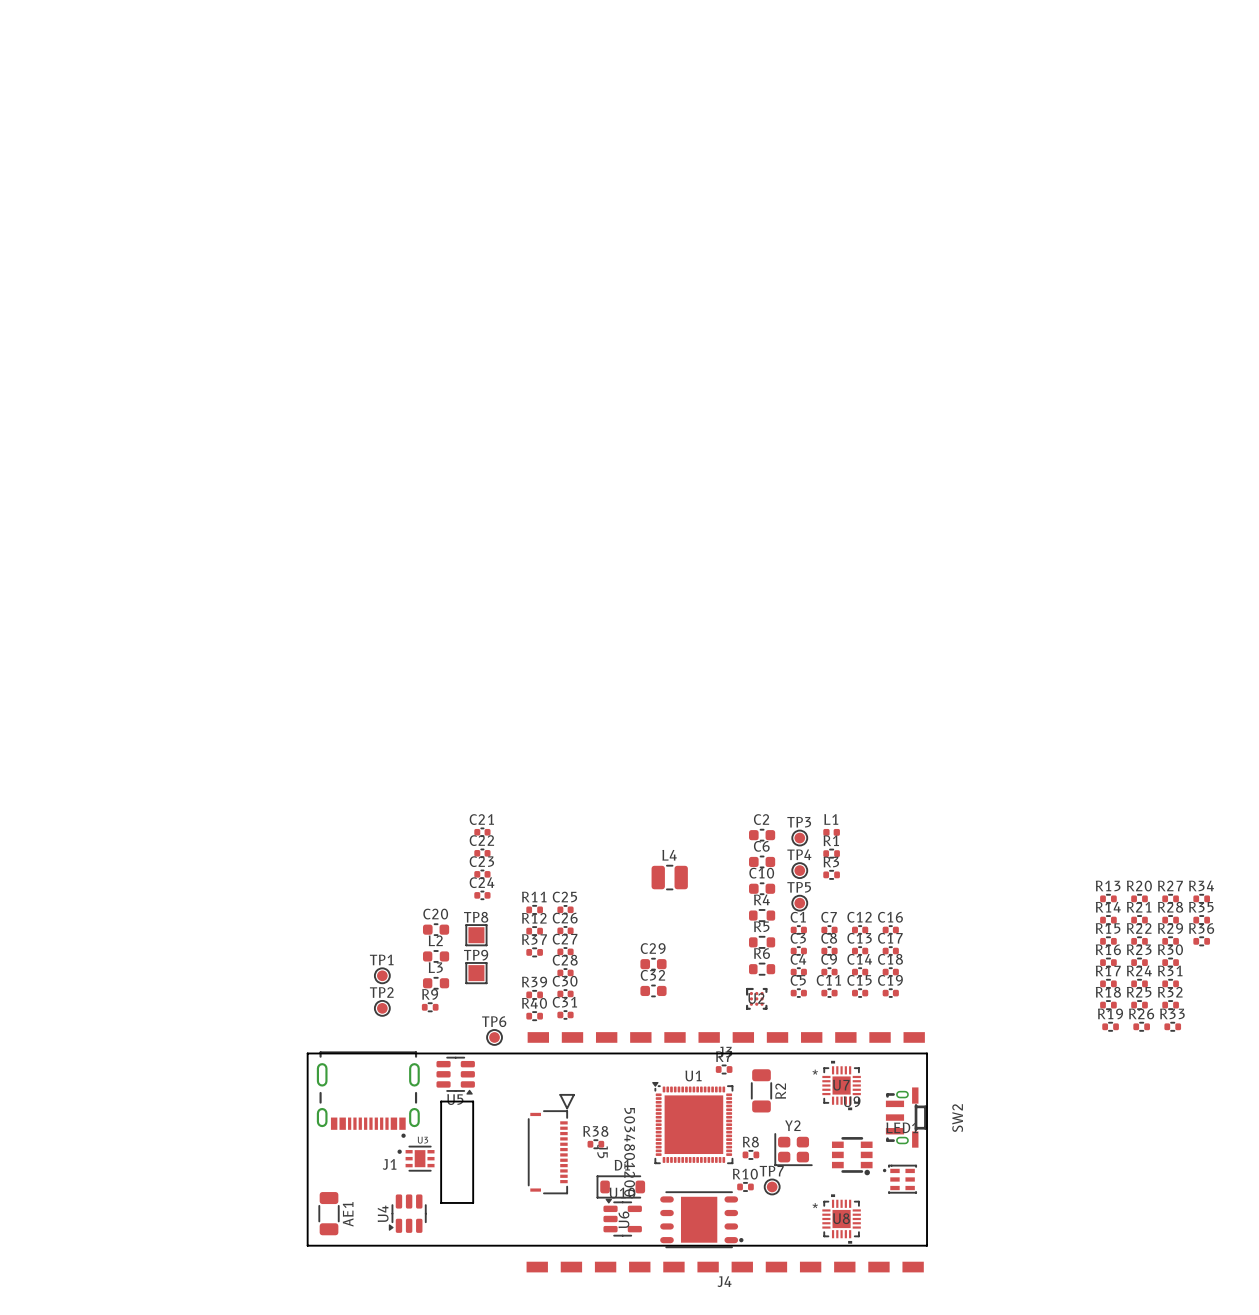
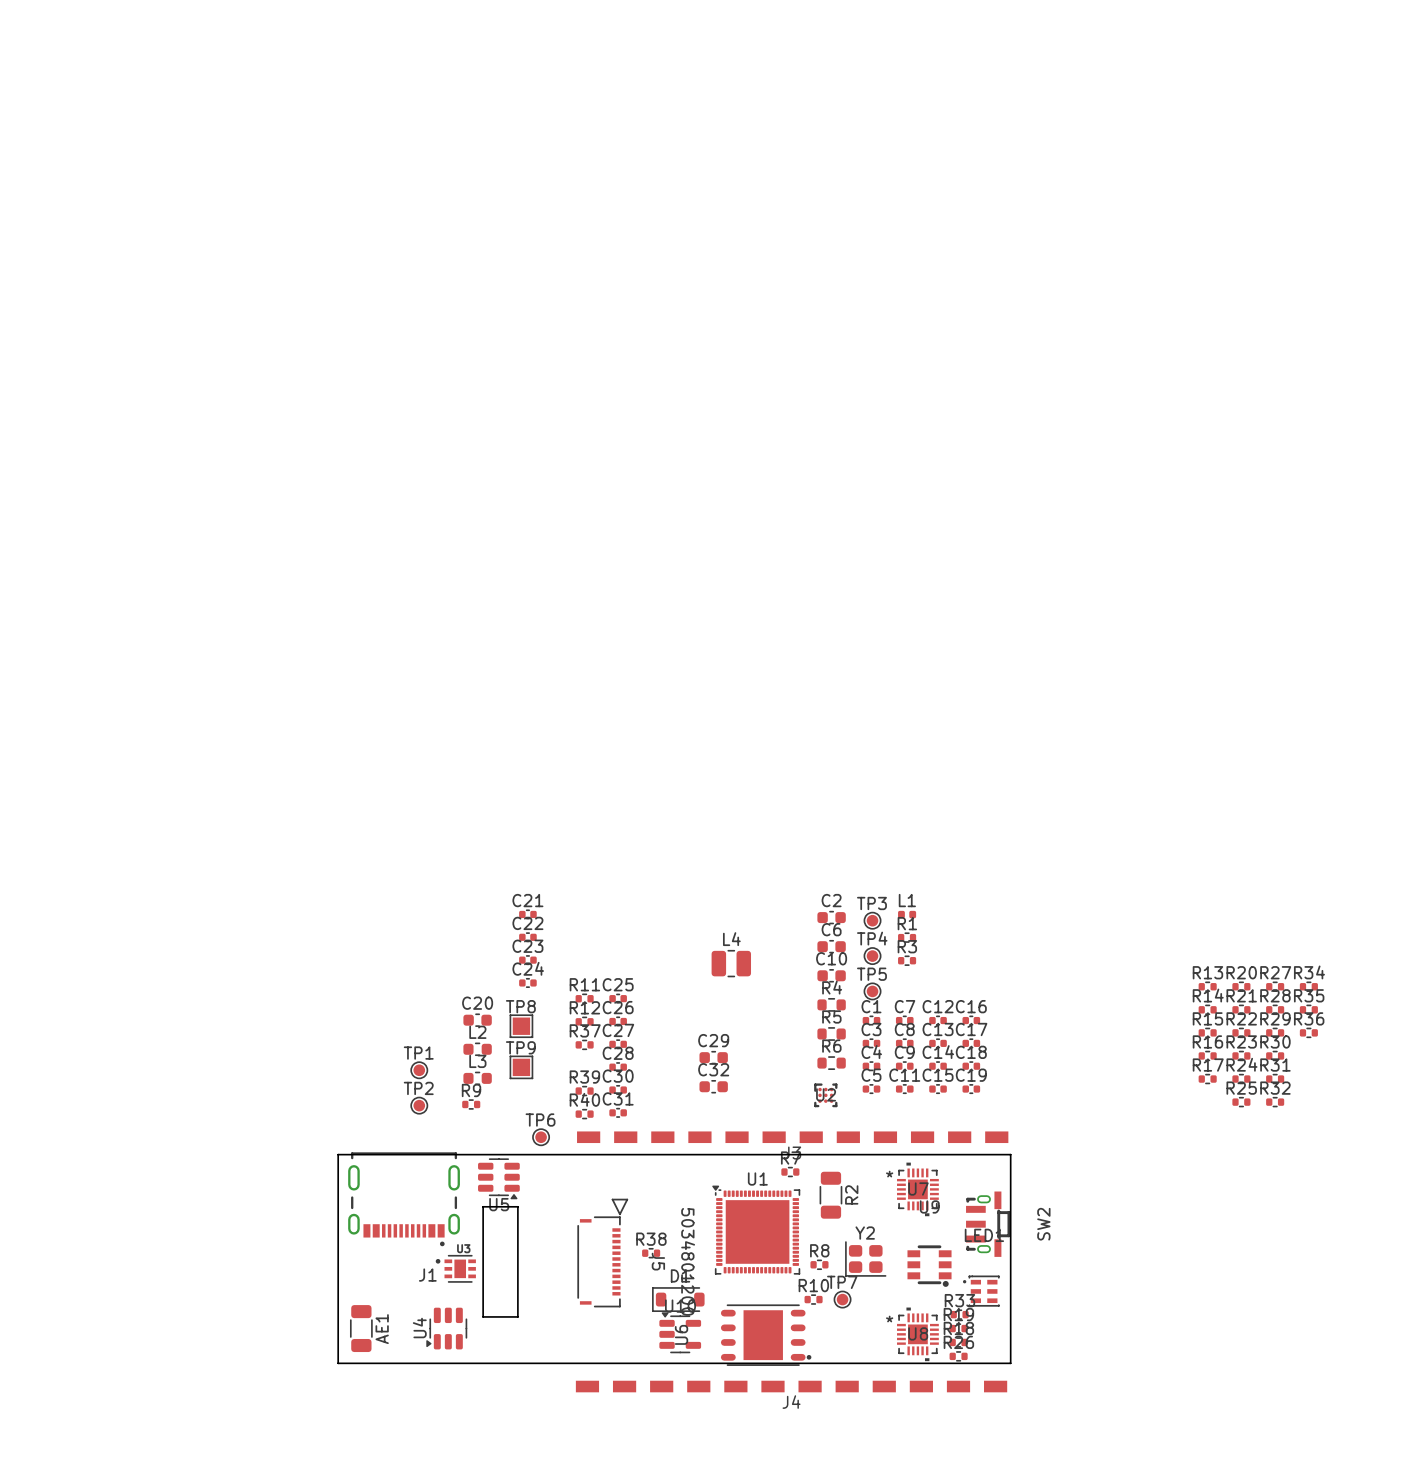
R18 position: (1108, 1005) -> (958, 1342)
R19 position: (1110, 1026) -> (958, 1328)
R26 position: (1141, 1026) -> (958, 1356)
R33 position: (1172, 1026) -> (959, 1314)

